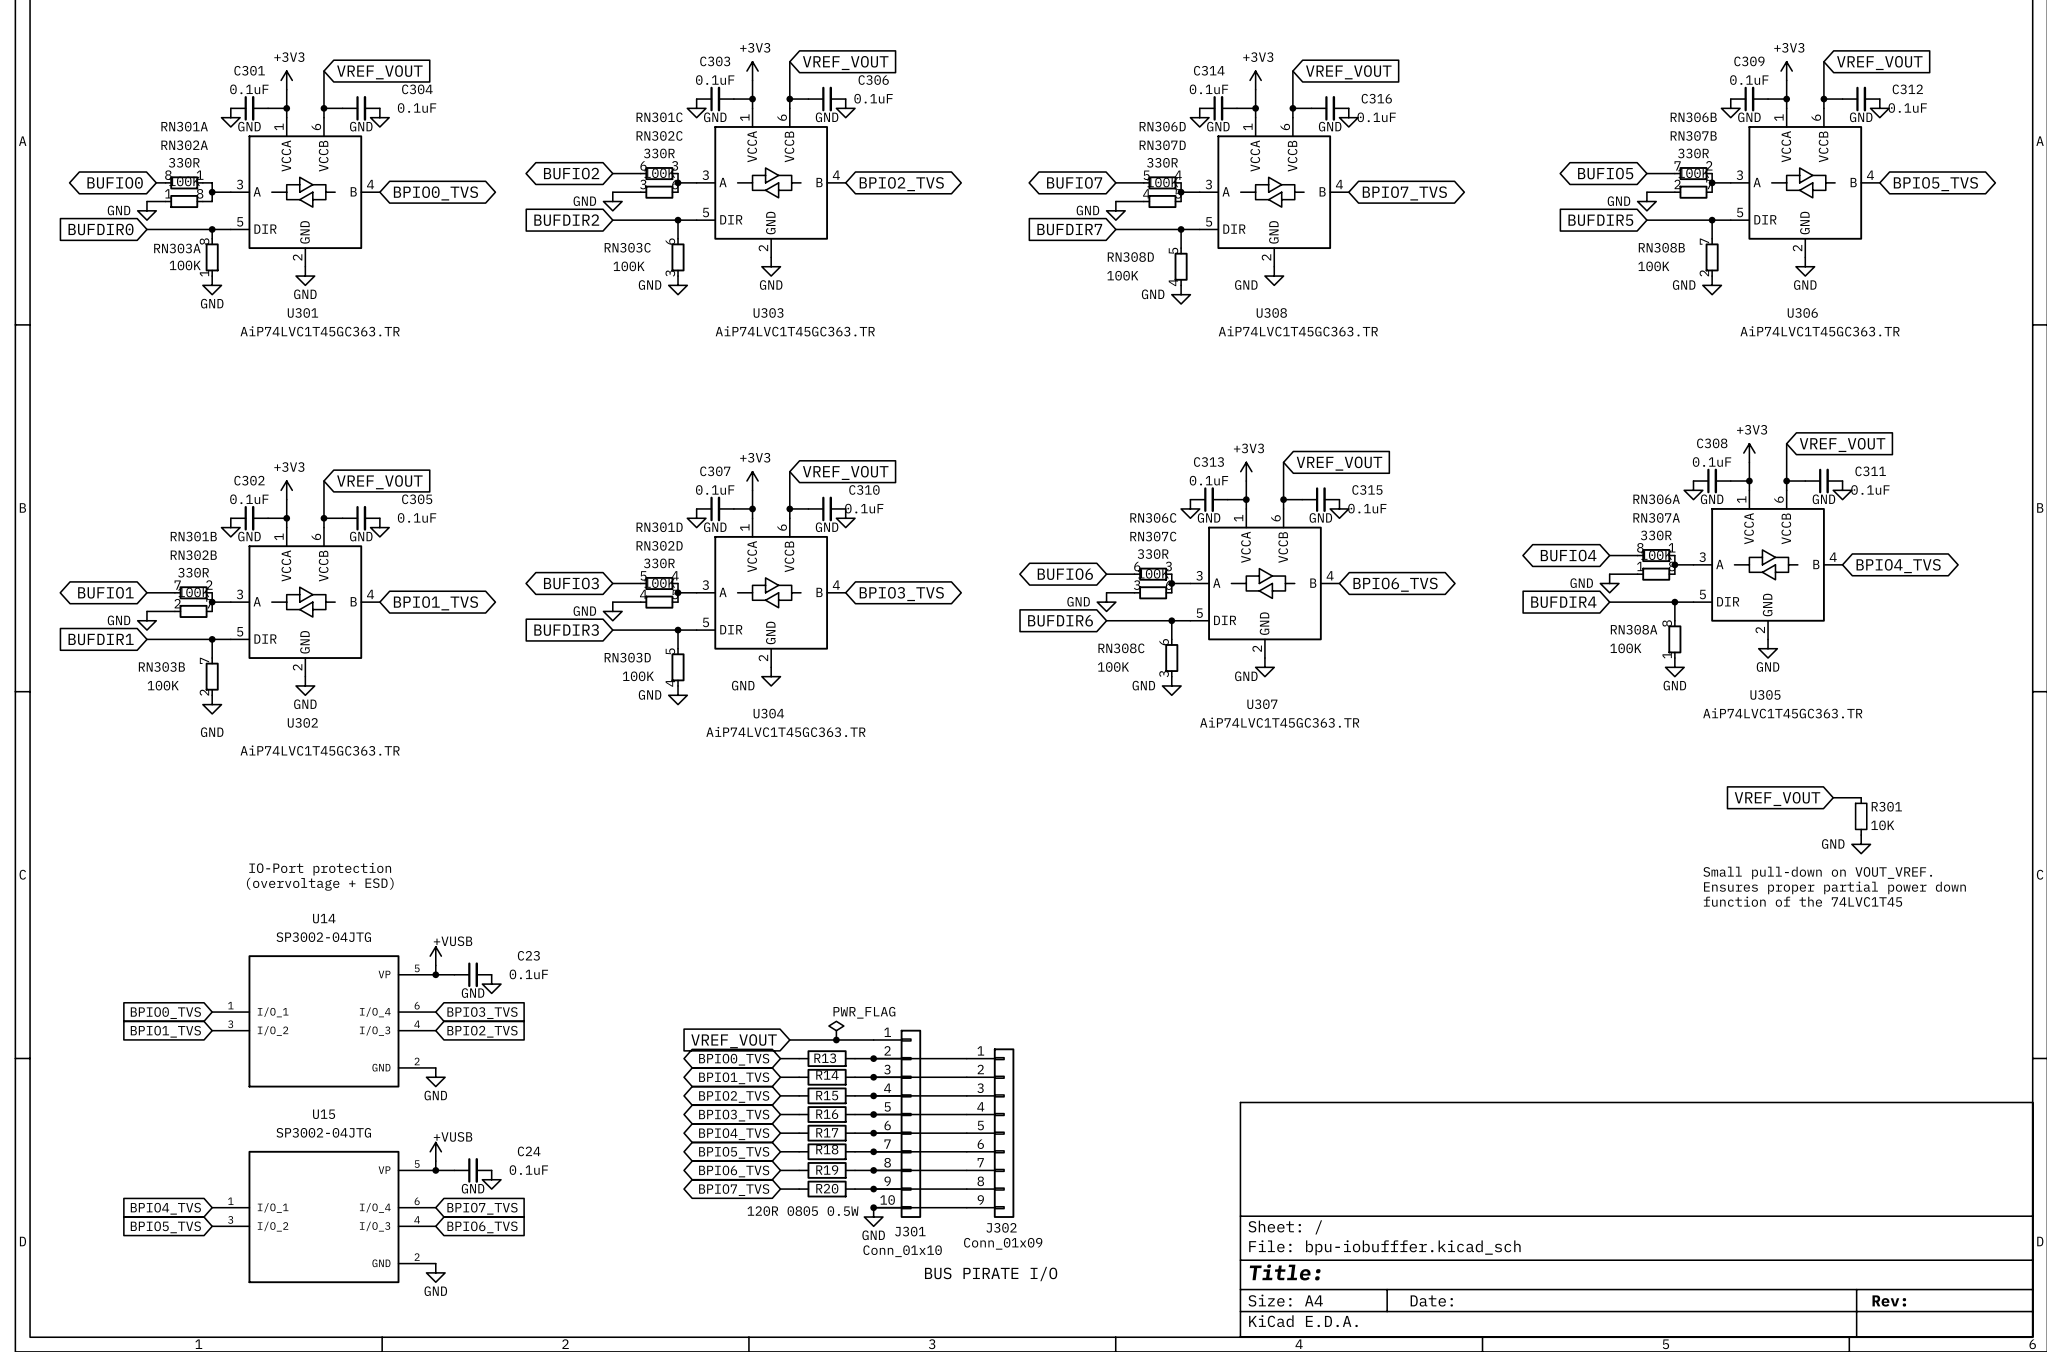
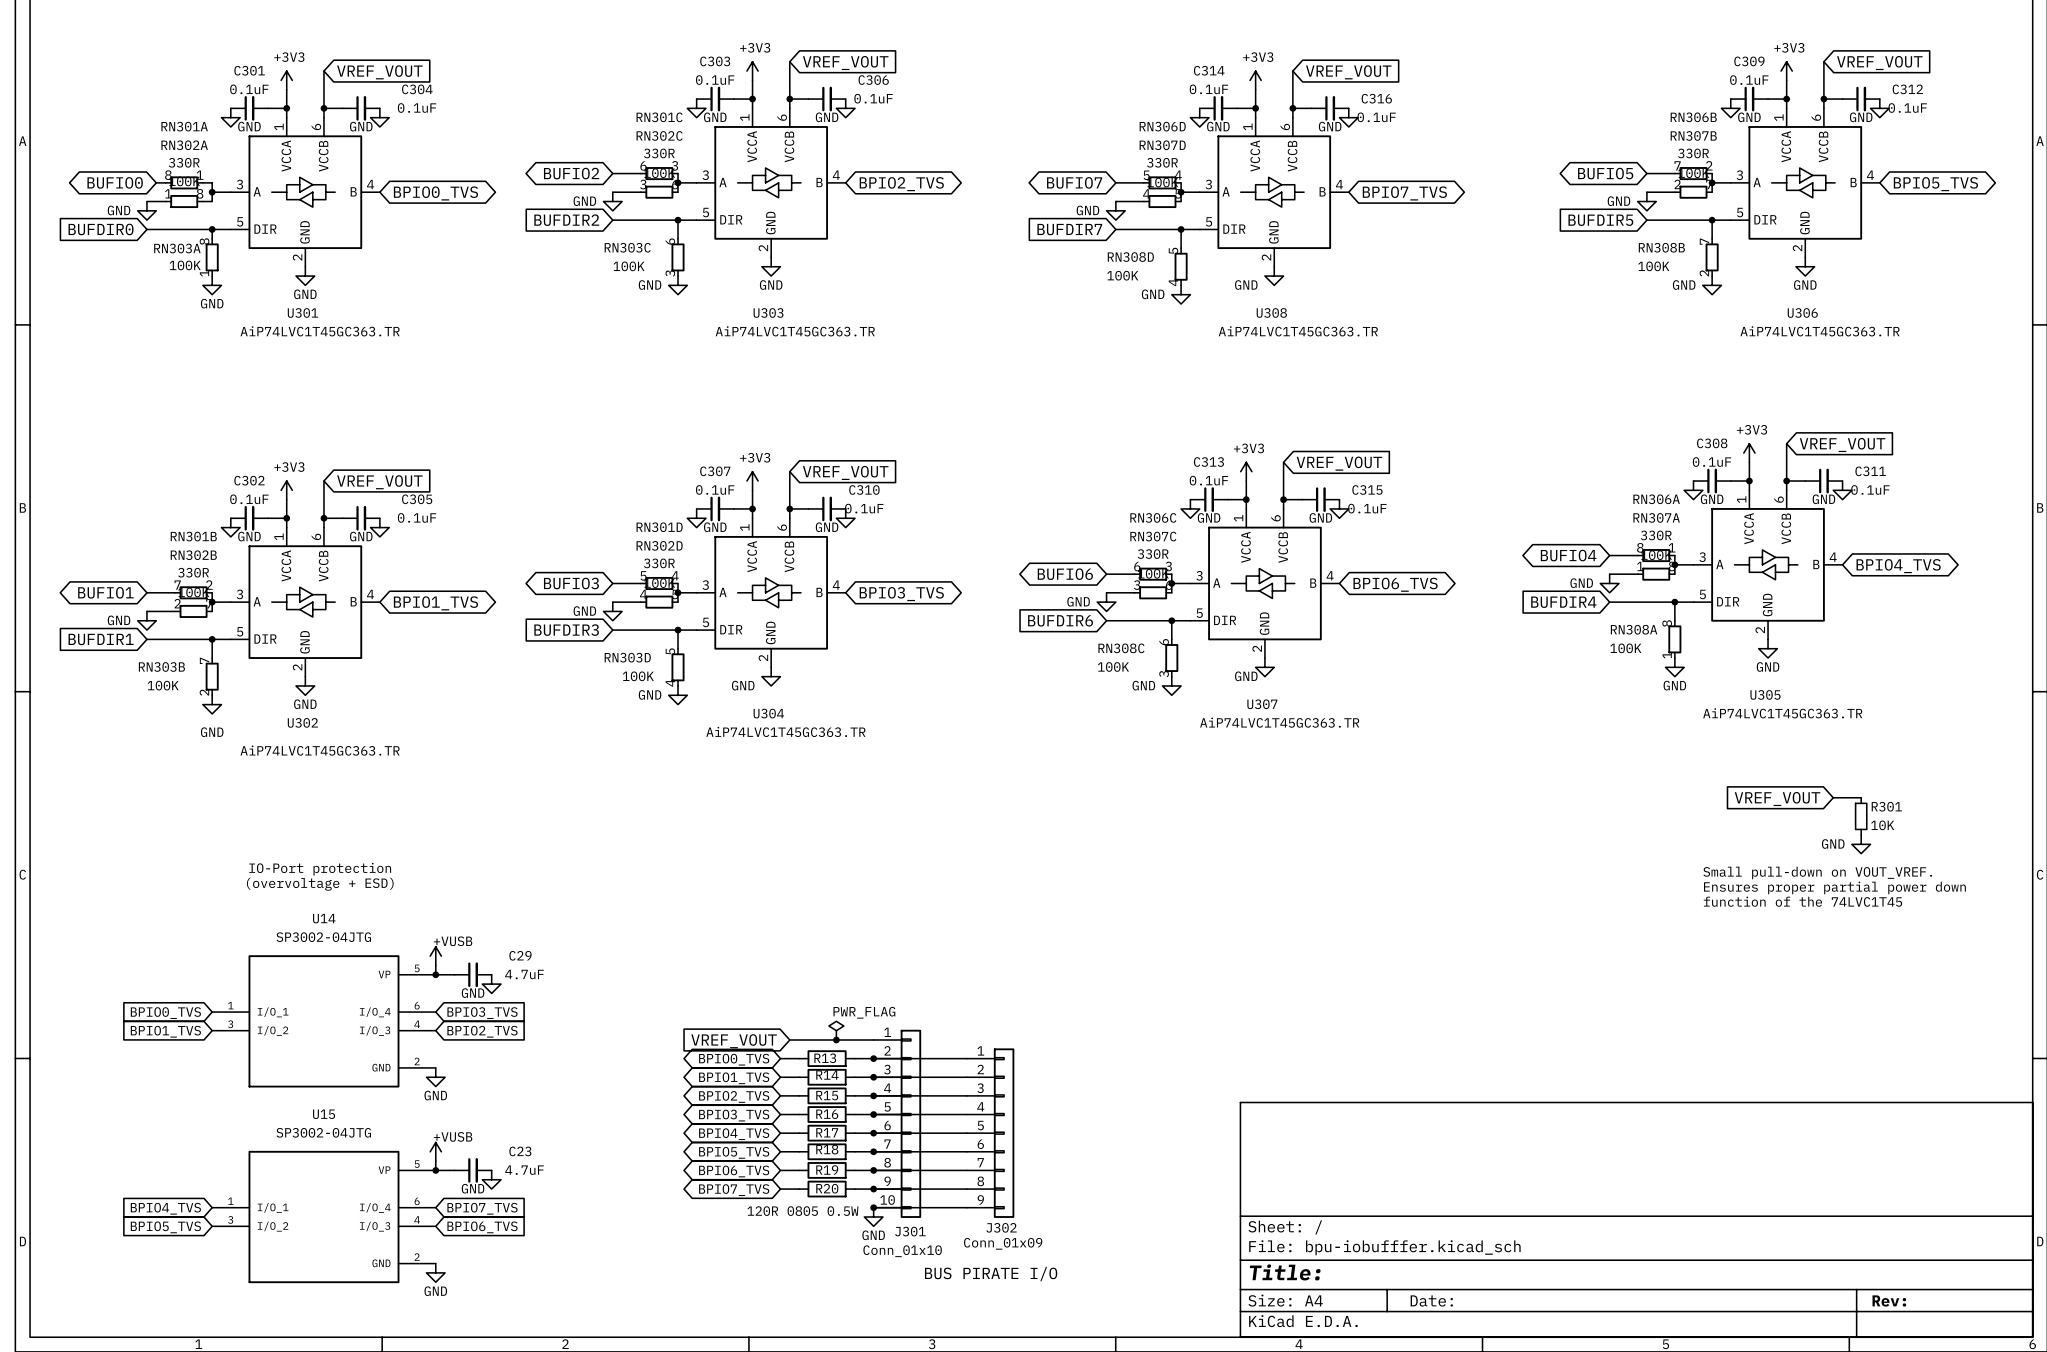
C23 name: C23 (528, 955) -> C29 (520, 955)
C23 value: 0.1uF (528, 974) -> 4.7uF (524, 974)
C24 name: C24 (529, 1151) -> C23 (520, 1151)
C24 value: 0.1uF (528, 1170) -> 4.7uF (524, 1170)

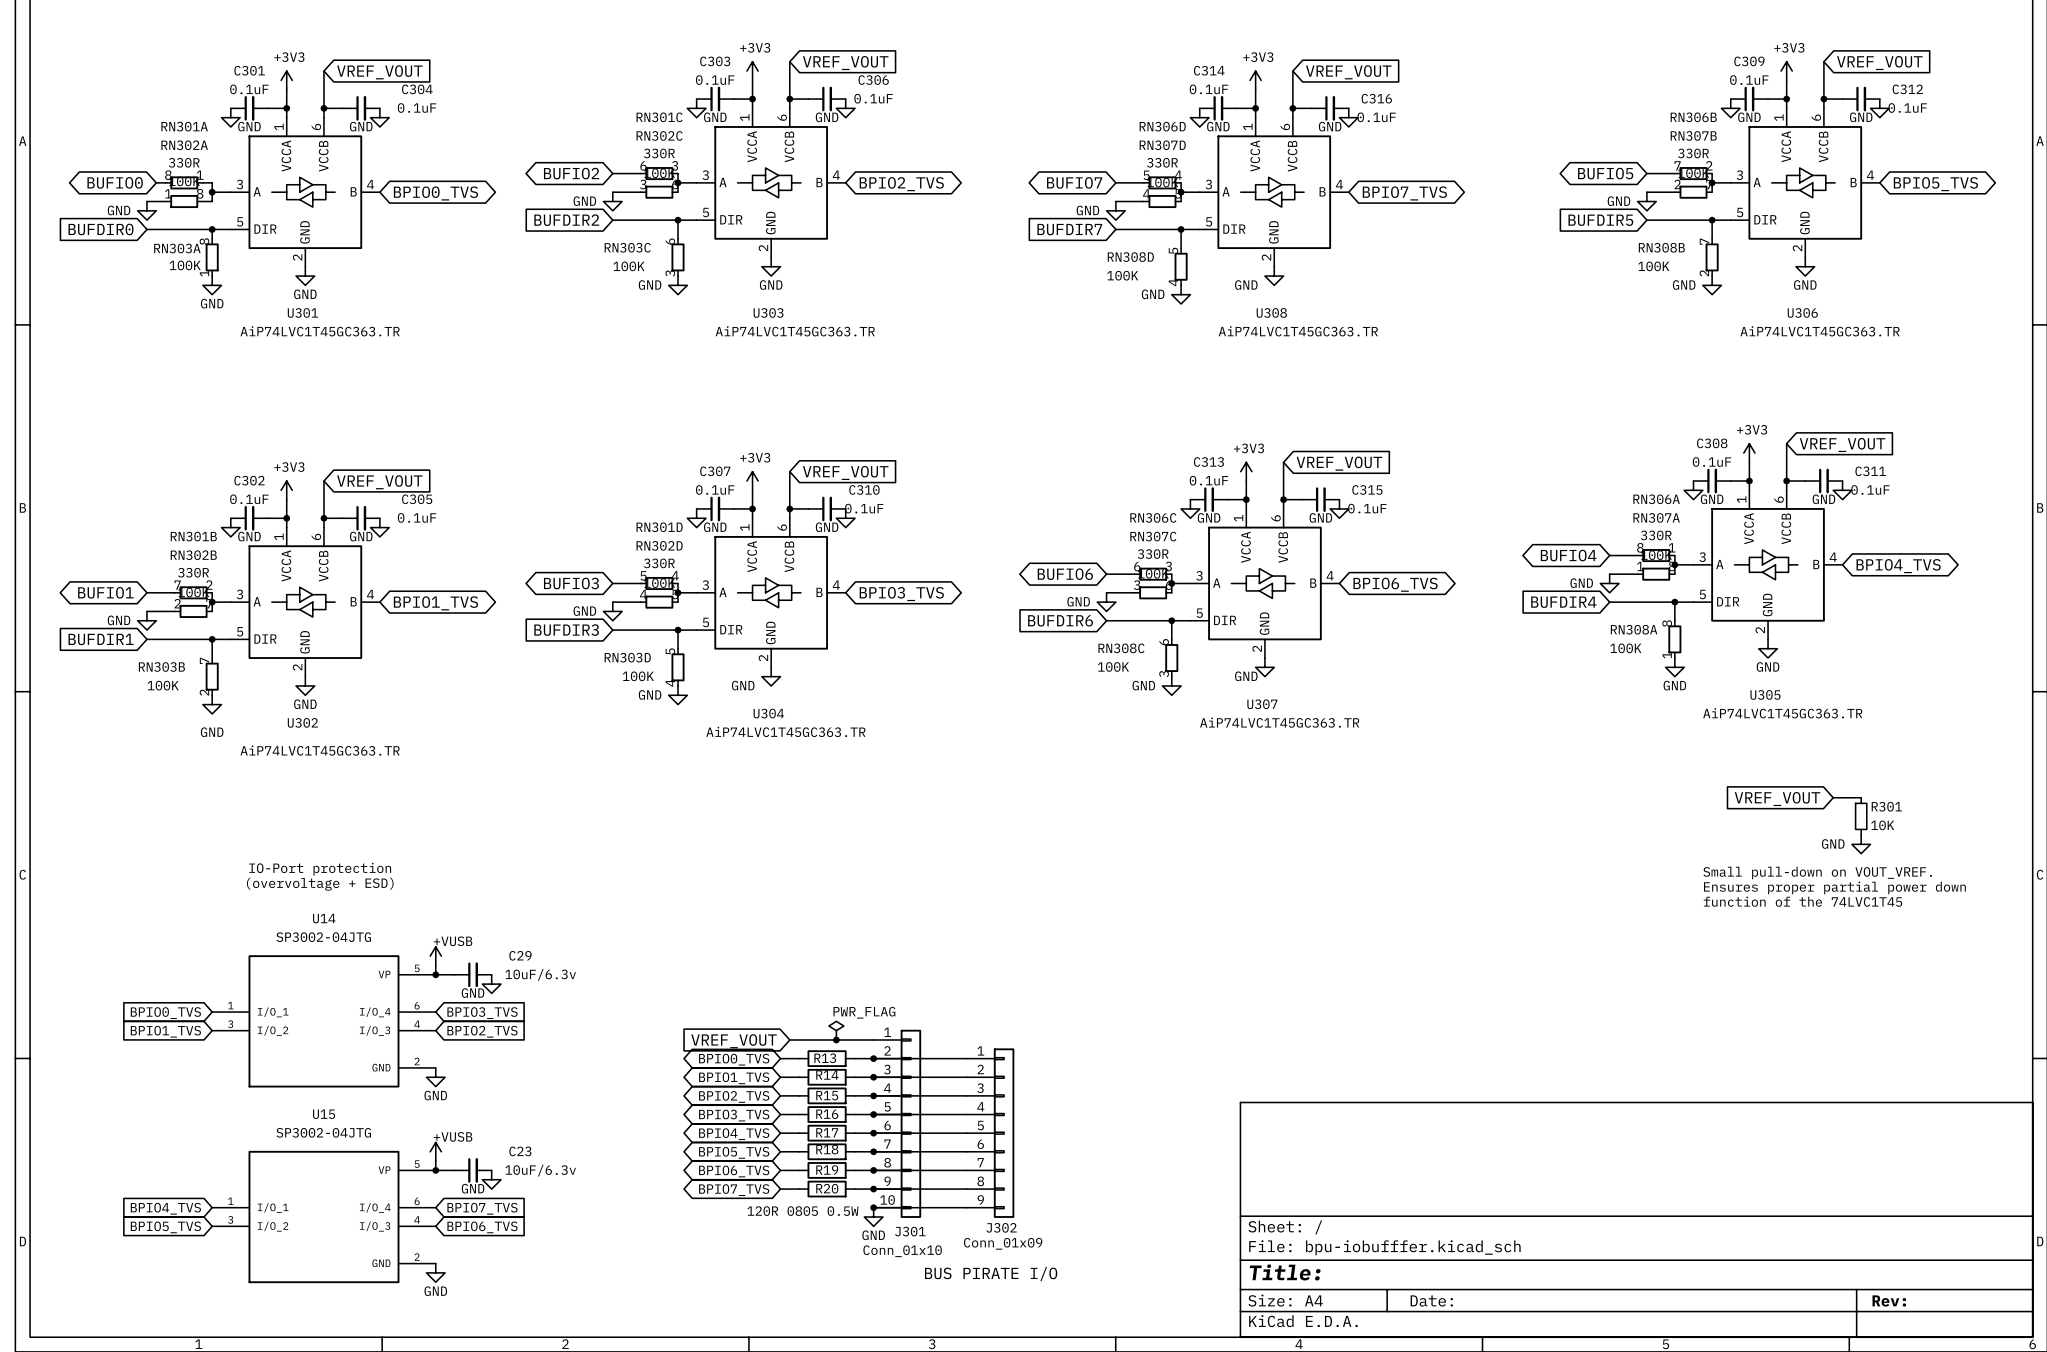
C29 value: 4.7uF (524, 974) -> 10uF/6.3v (540, 974)
C23 value: 4.7uF (524, 1170) -> 10uF/6.3v (540, 1170)

